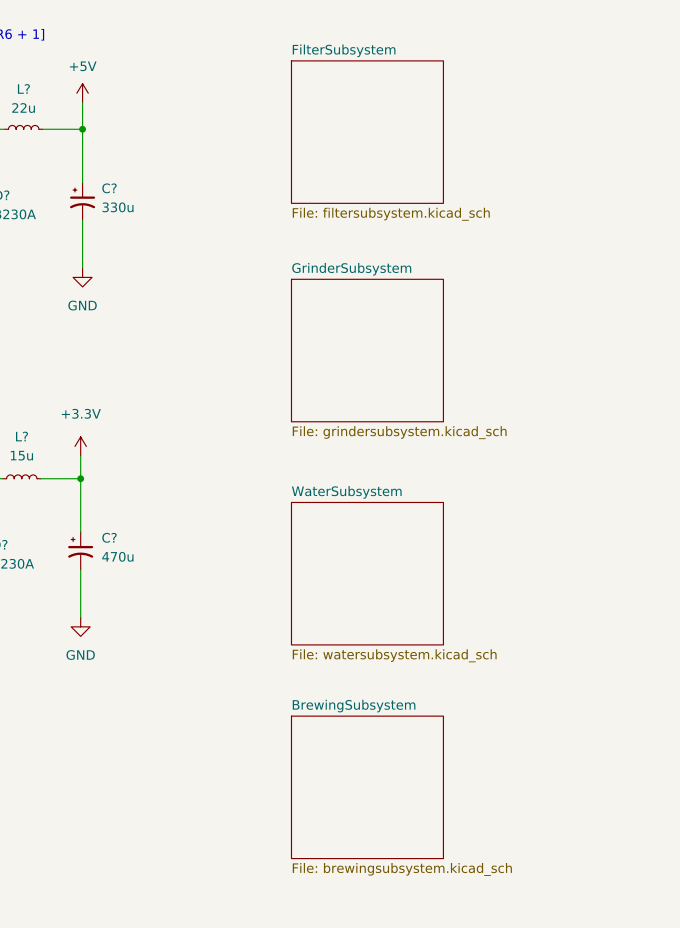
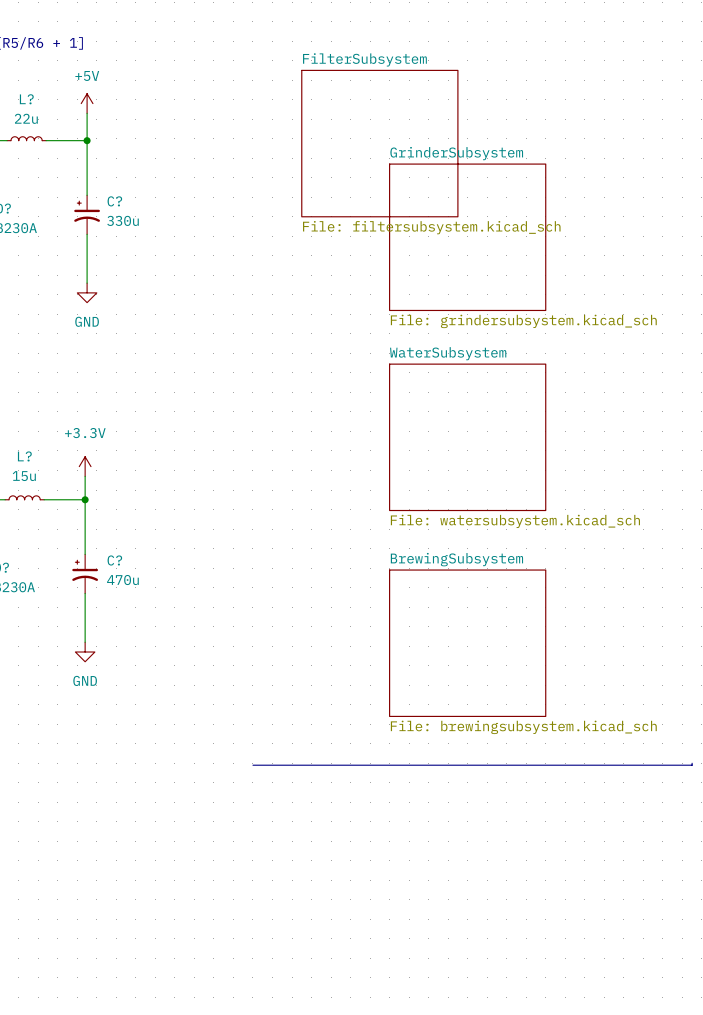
sheet GrinderSubsystem position: (367, 350) -> (467, 237)
sheet WaterSubsystem position: (367, 573) -> (467, 437)
sheet BrewingSubsystem: none -> File: brewingsubsystem.kicad_sch (467, 643)
line: none -> (692, 763) (692, 765) (252, 765)
sheet BrewingSubsystem: File: brewingsubsystem.kicad_sch (367, 787) -> none

